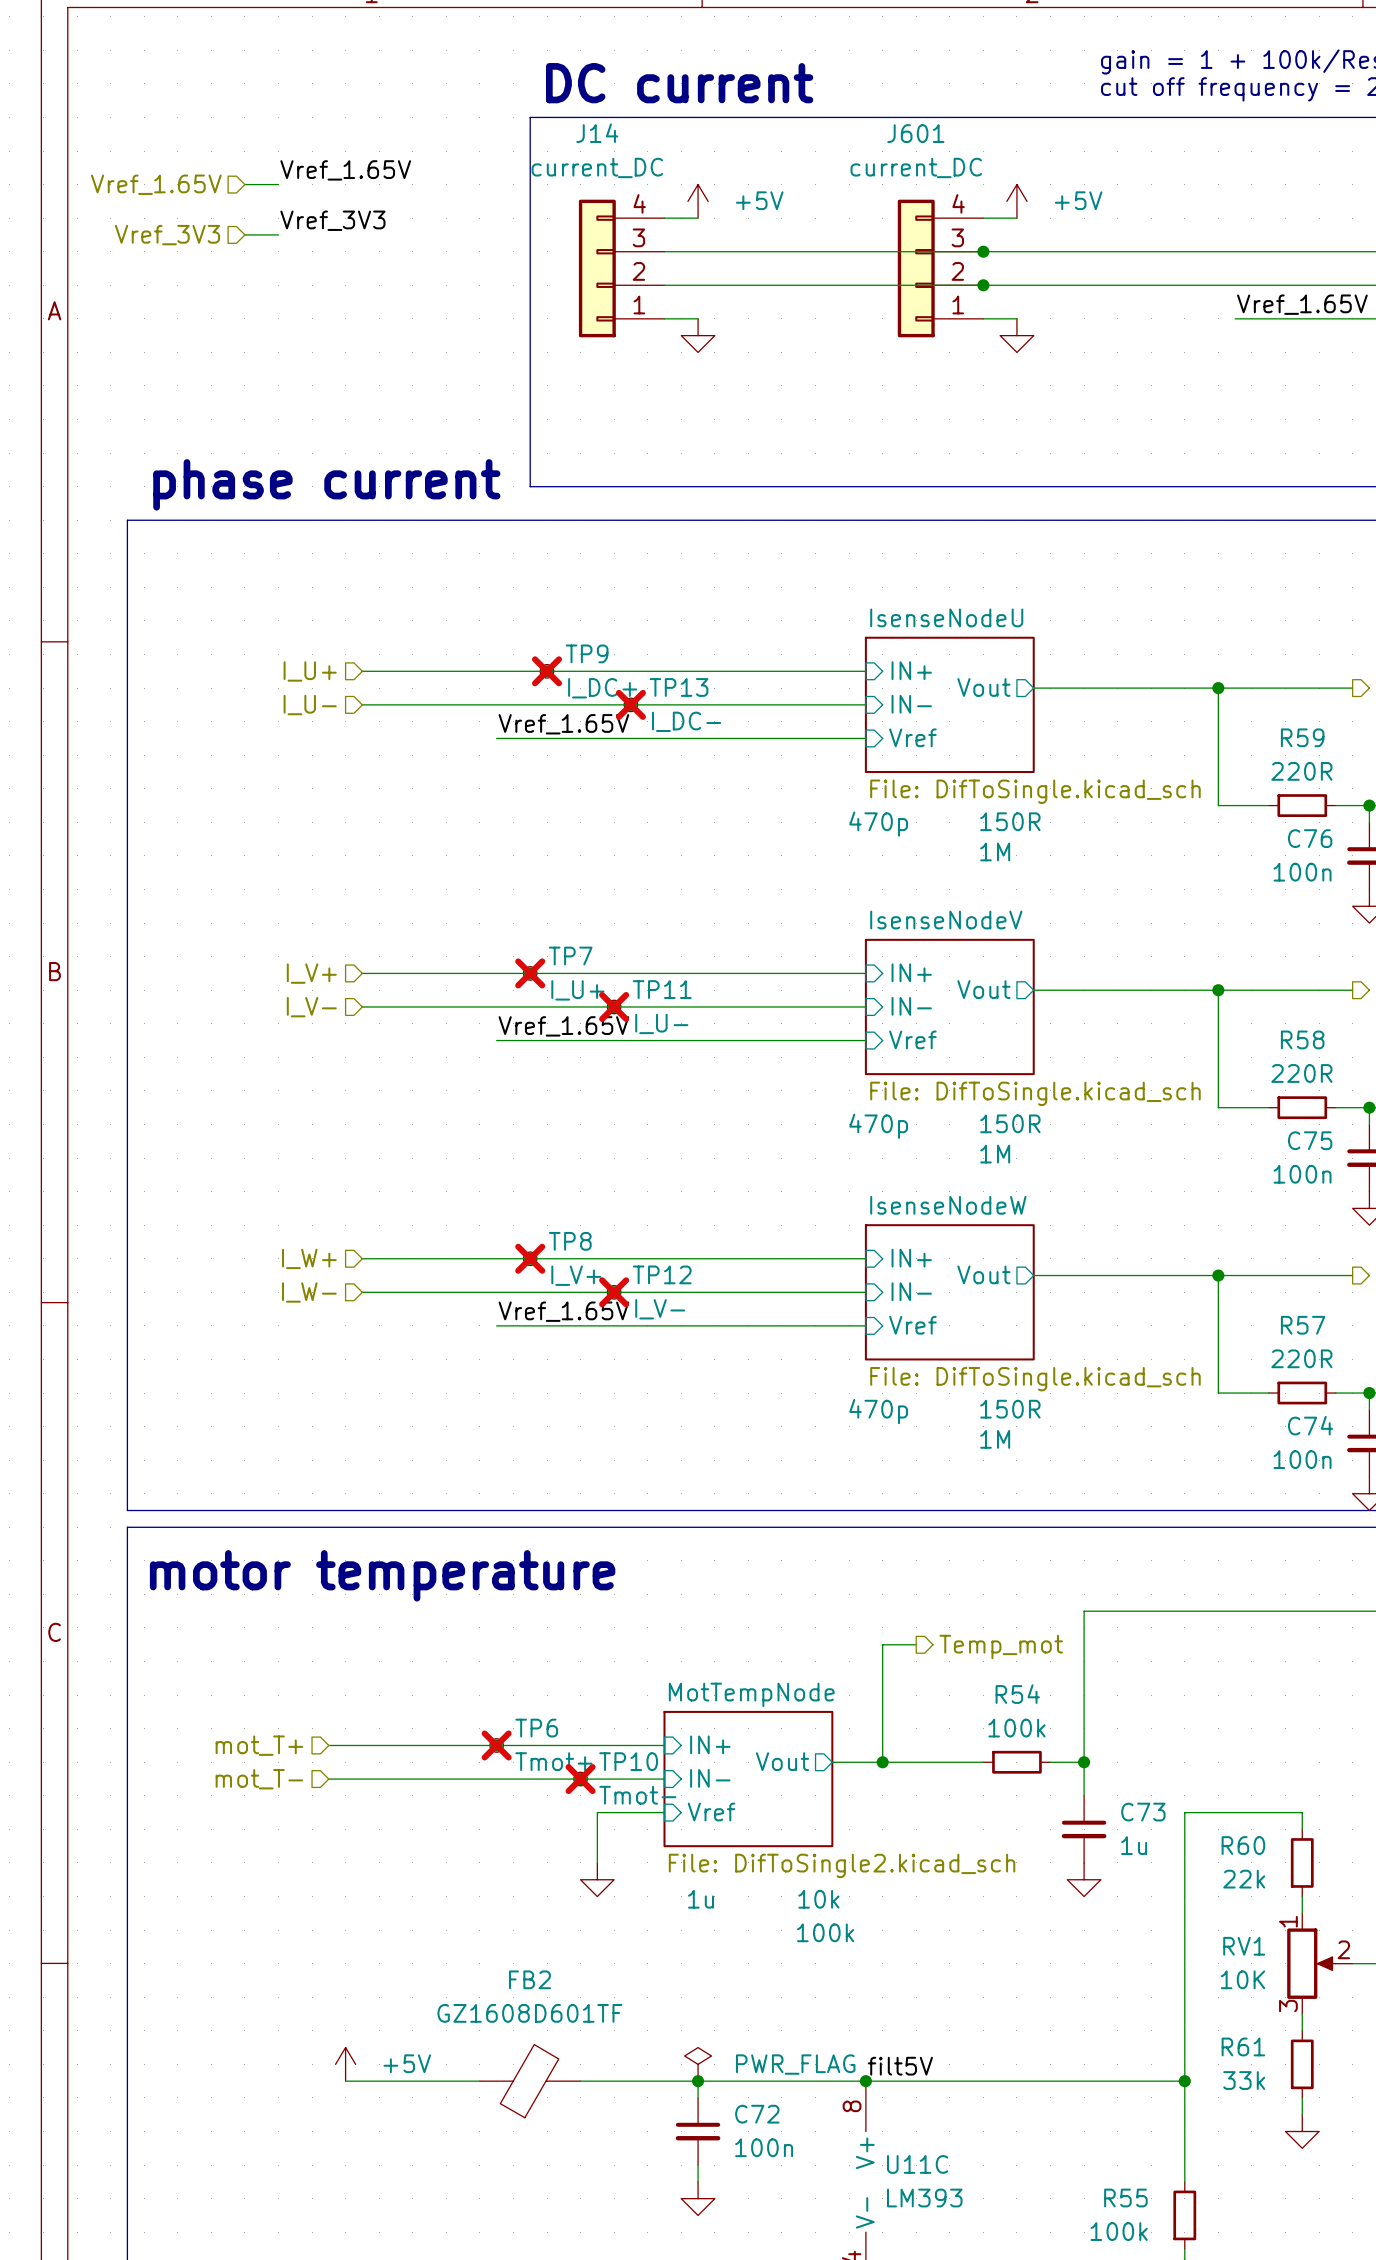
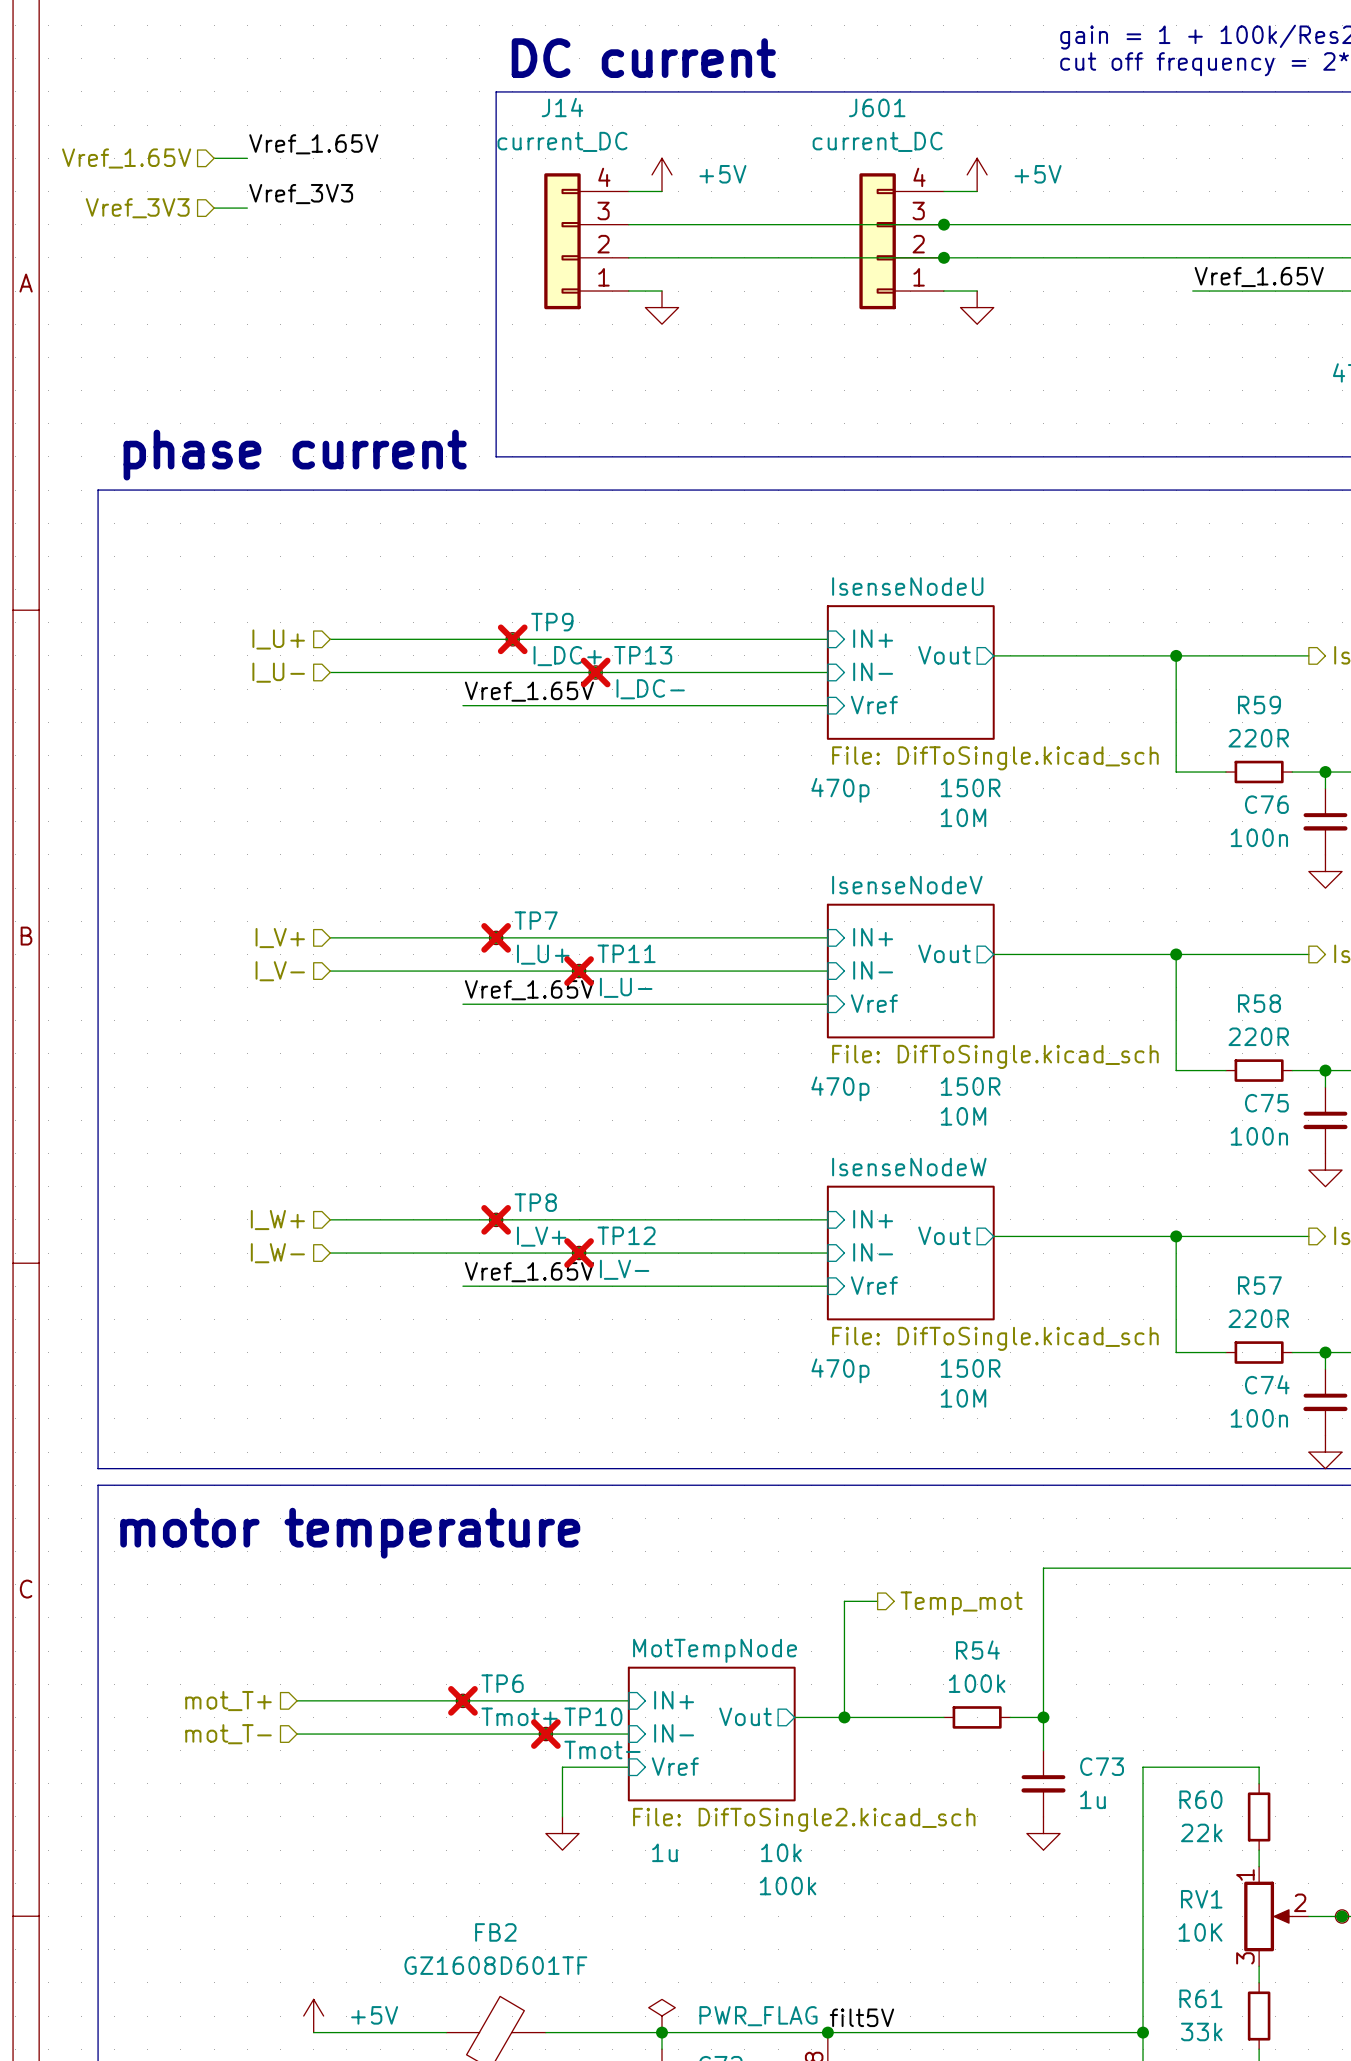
sheet IsenseNodeU text: 1M (995, 851) -> 10M (963, 817)
sheet IsenseNodeV text: 1M (995, 1154) -> 10M (963, 1116)
sheet IsenseNodeW text: 1M (995, 1439) -> 10M (963, 1398)

